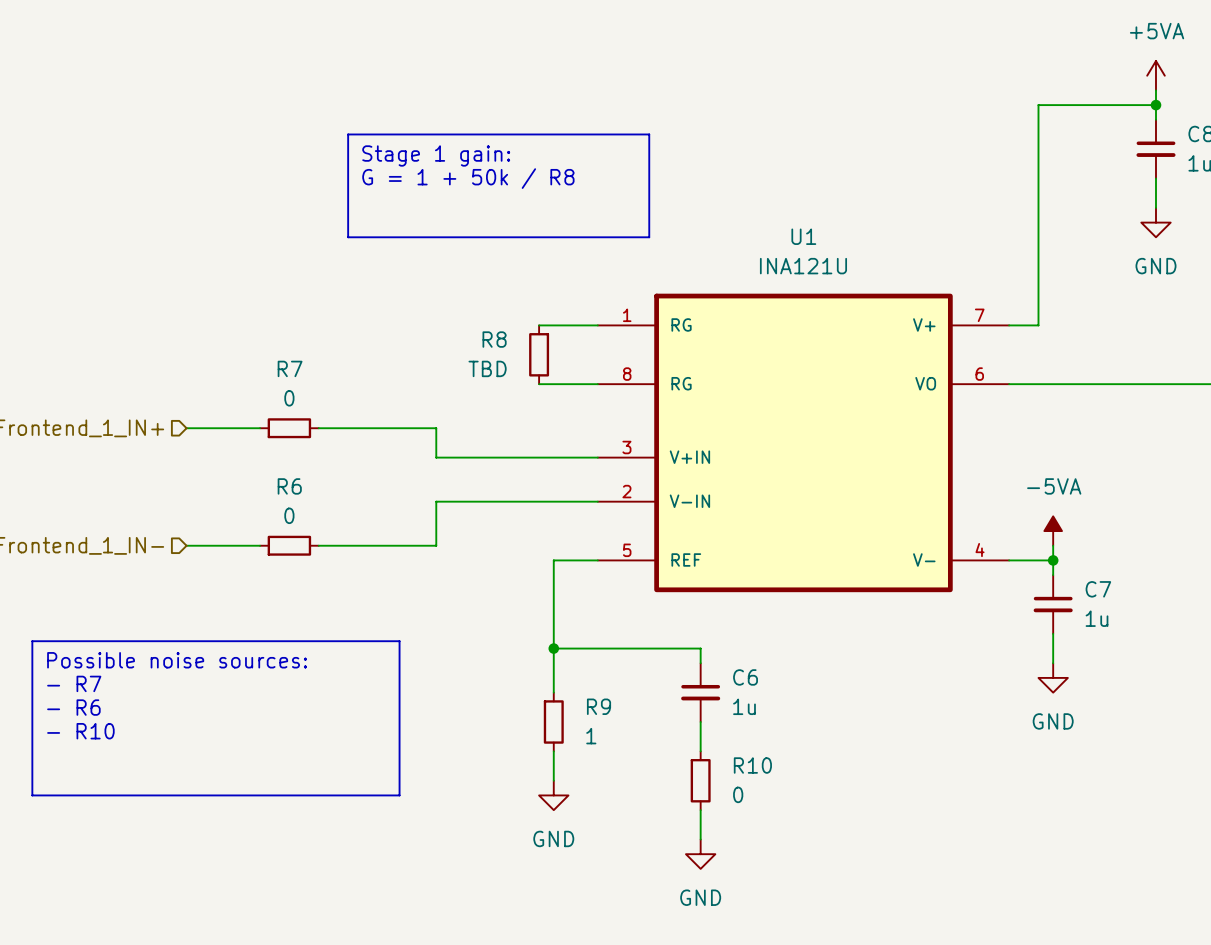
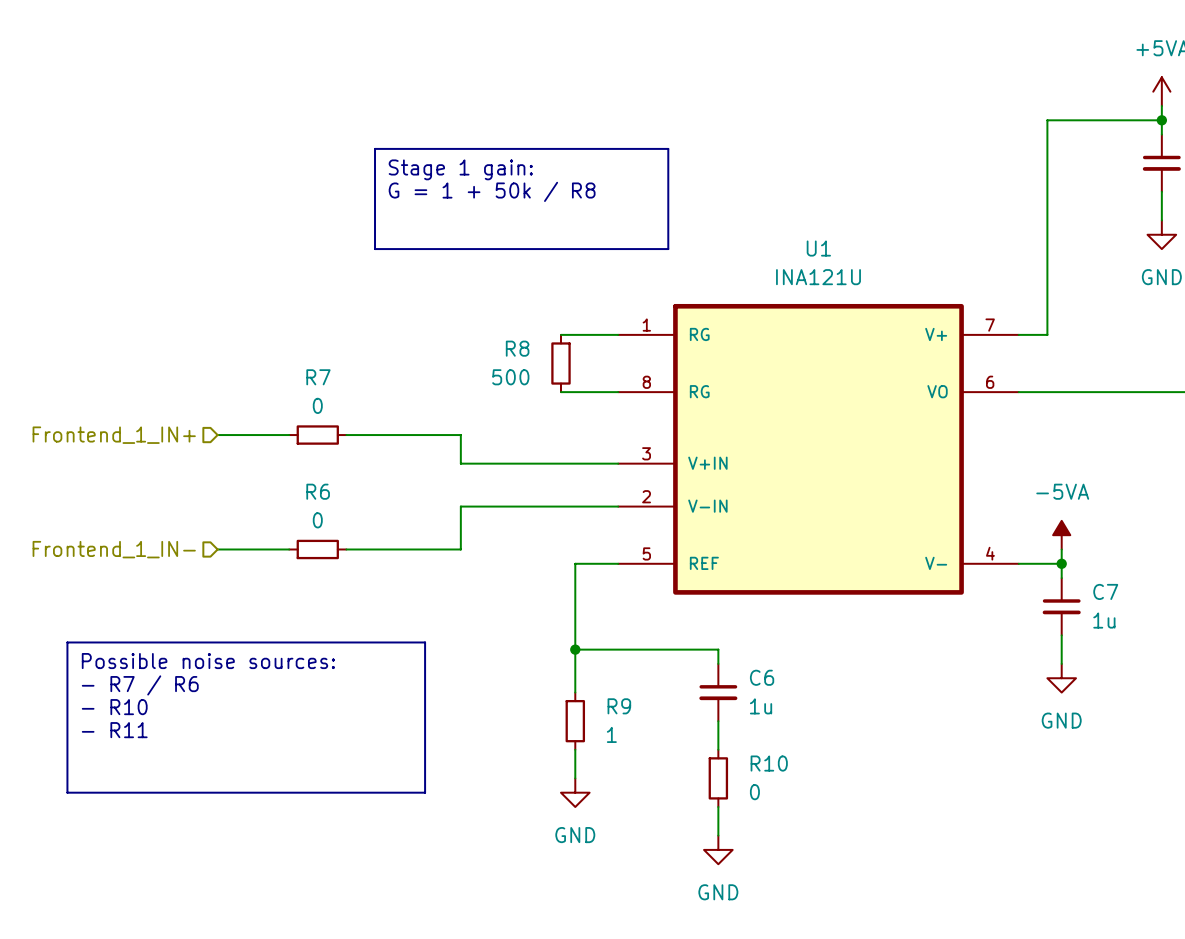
R8 value: TBD (487, 368) -> 500 (510, 377)
text: - R7 (74, 683) -> - R7 / R6 (140, 685)
text: - R6 (73, 707) -> - R10 (114, 707)
text: - R10 (80, 731) -> - R11 (114, 730)

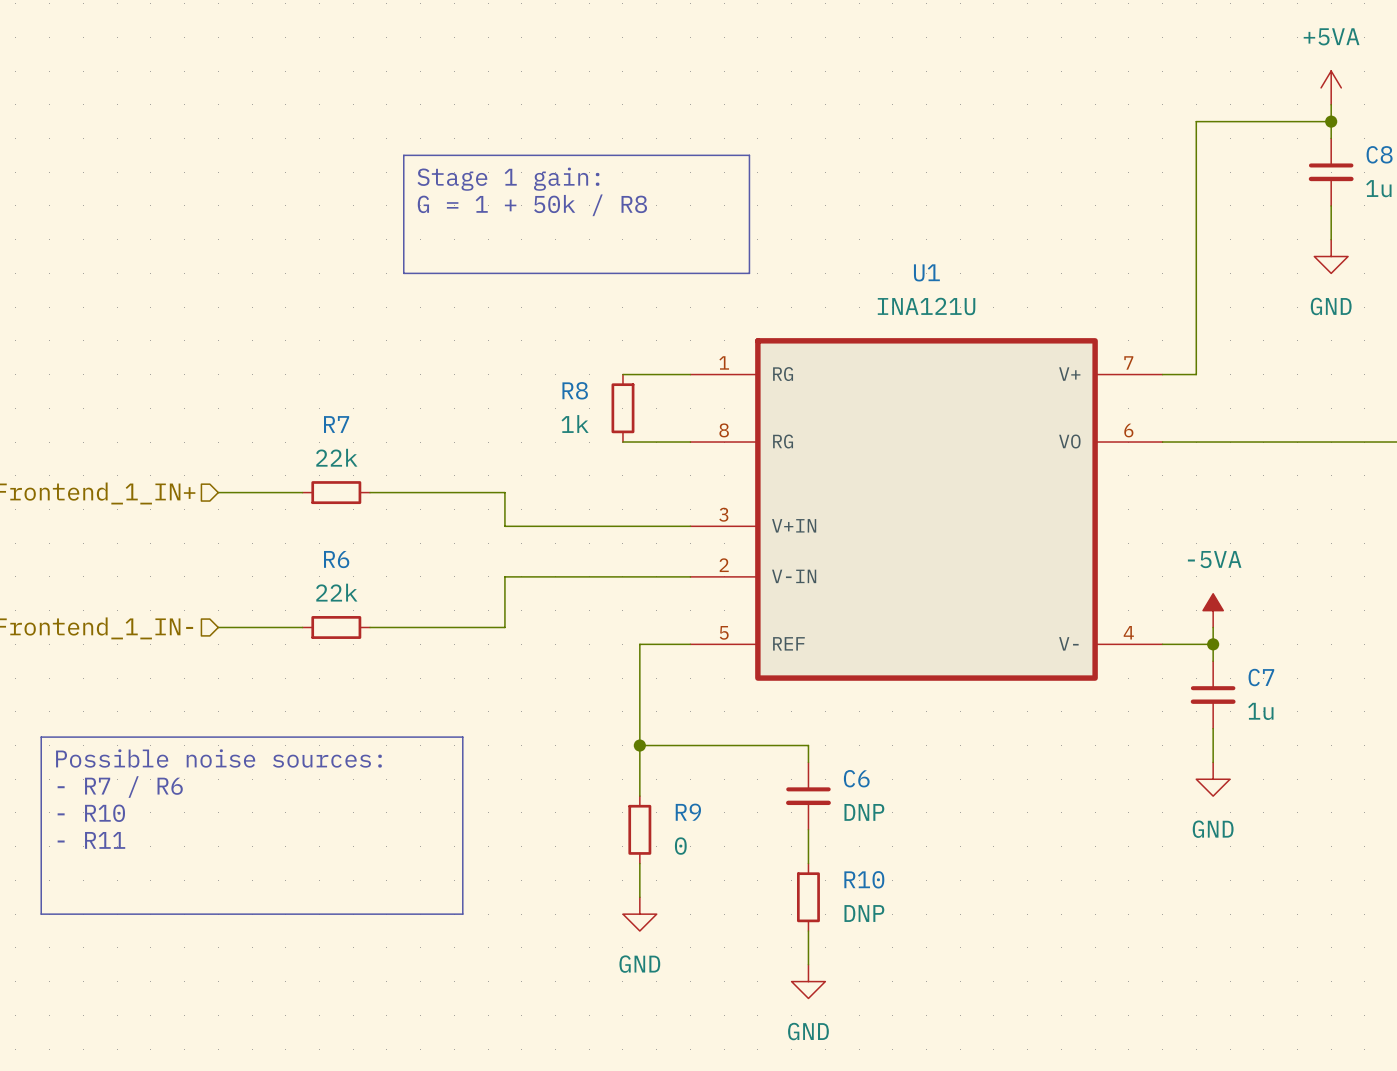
R8 value: 500 (510, 377) -> 1k (575, 424)
R7 value: 0 (317, 405) -> 22k (336, 457)
R6 value: 0 (317, 520) -> 22k (336, 592)
C6 value: 1u (761, 706) -> DNP (864, 812)
R9 value: 1 (611, 734) -> 0 (680, 846)
R10 value: 0 (754, 792) -> DNP (864, 913)

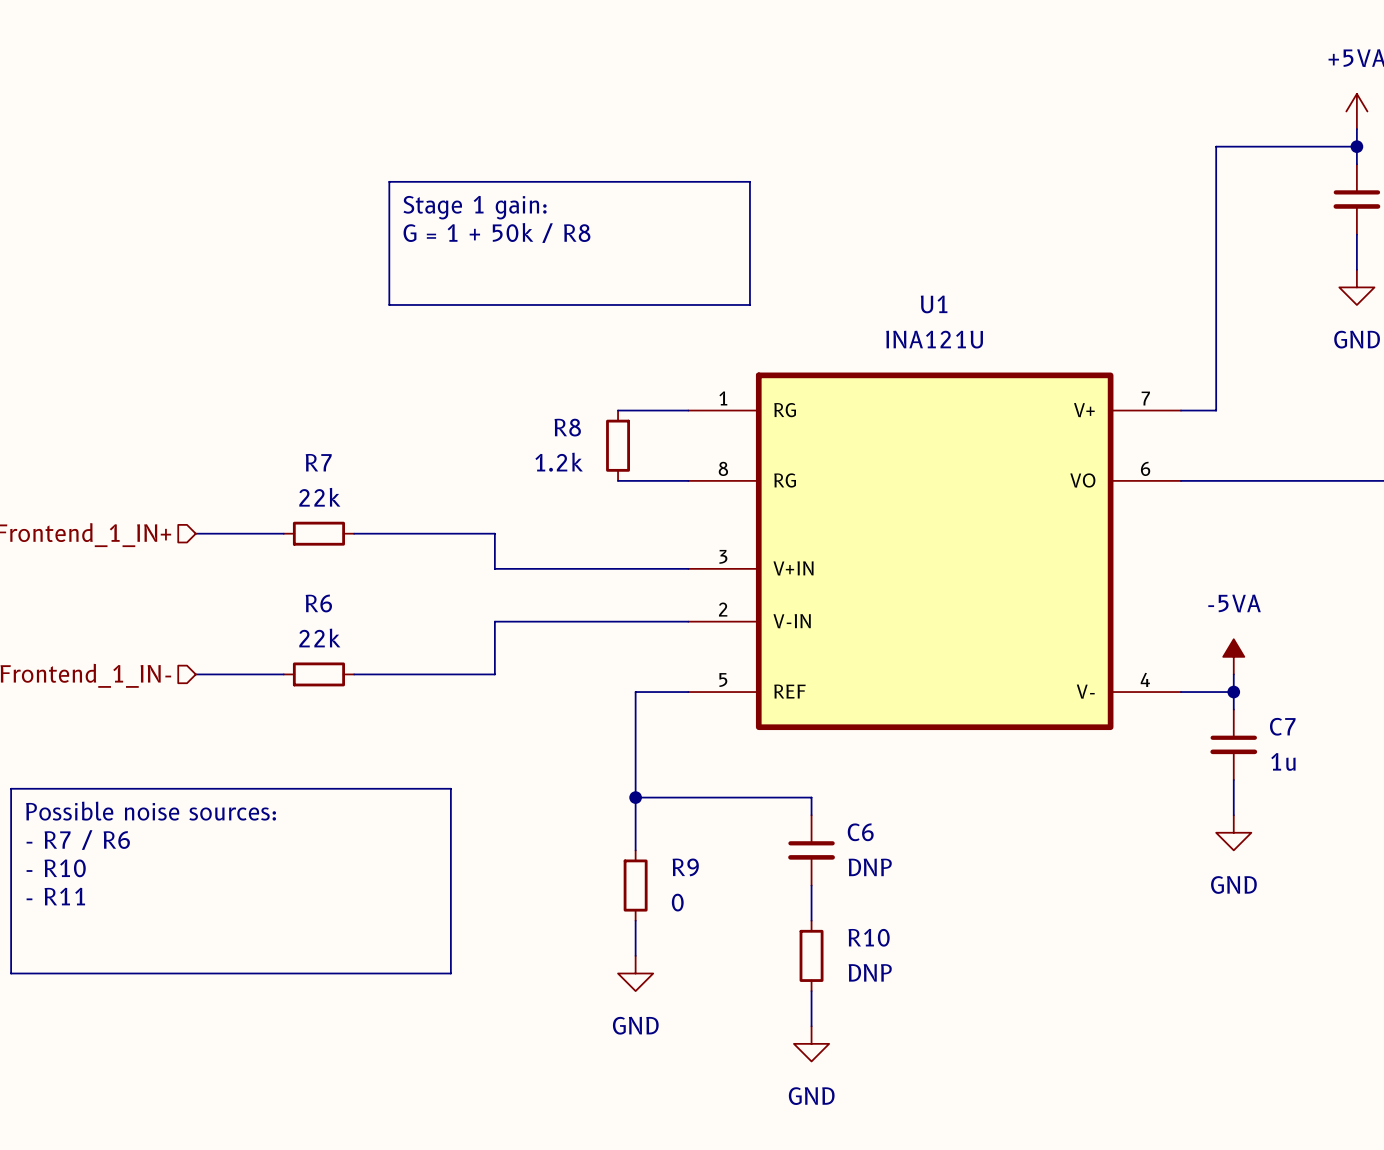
R8 value: 1k (575, 424) -> 1.2k (559, 462)

